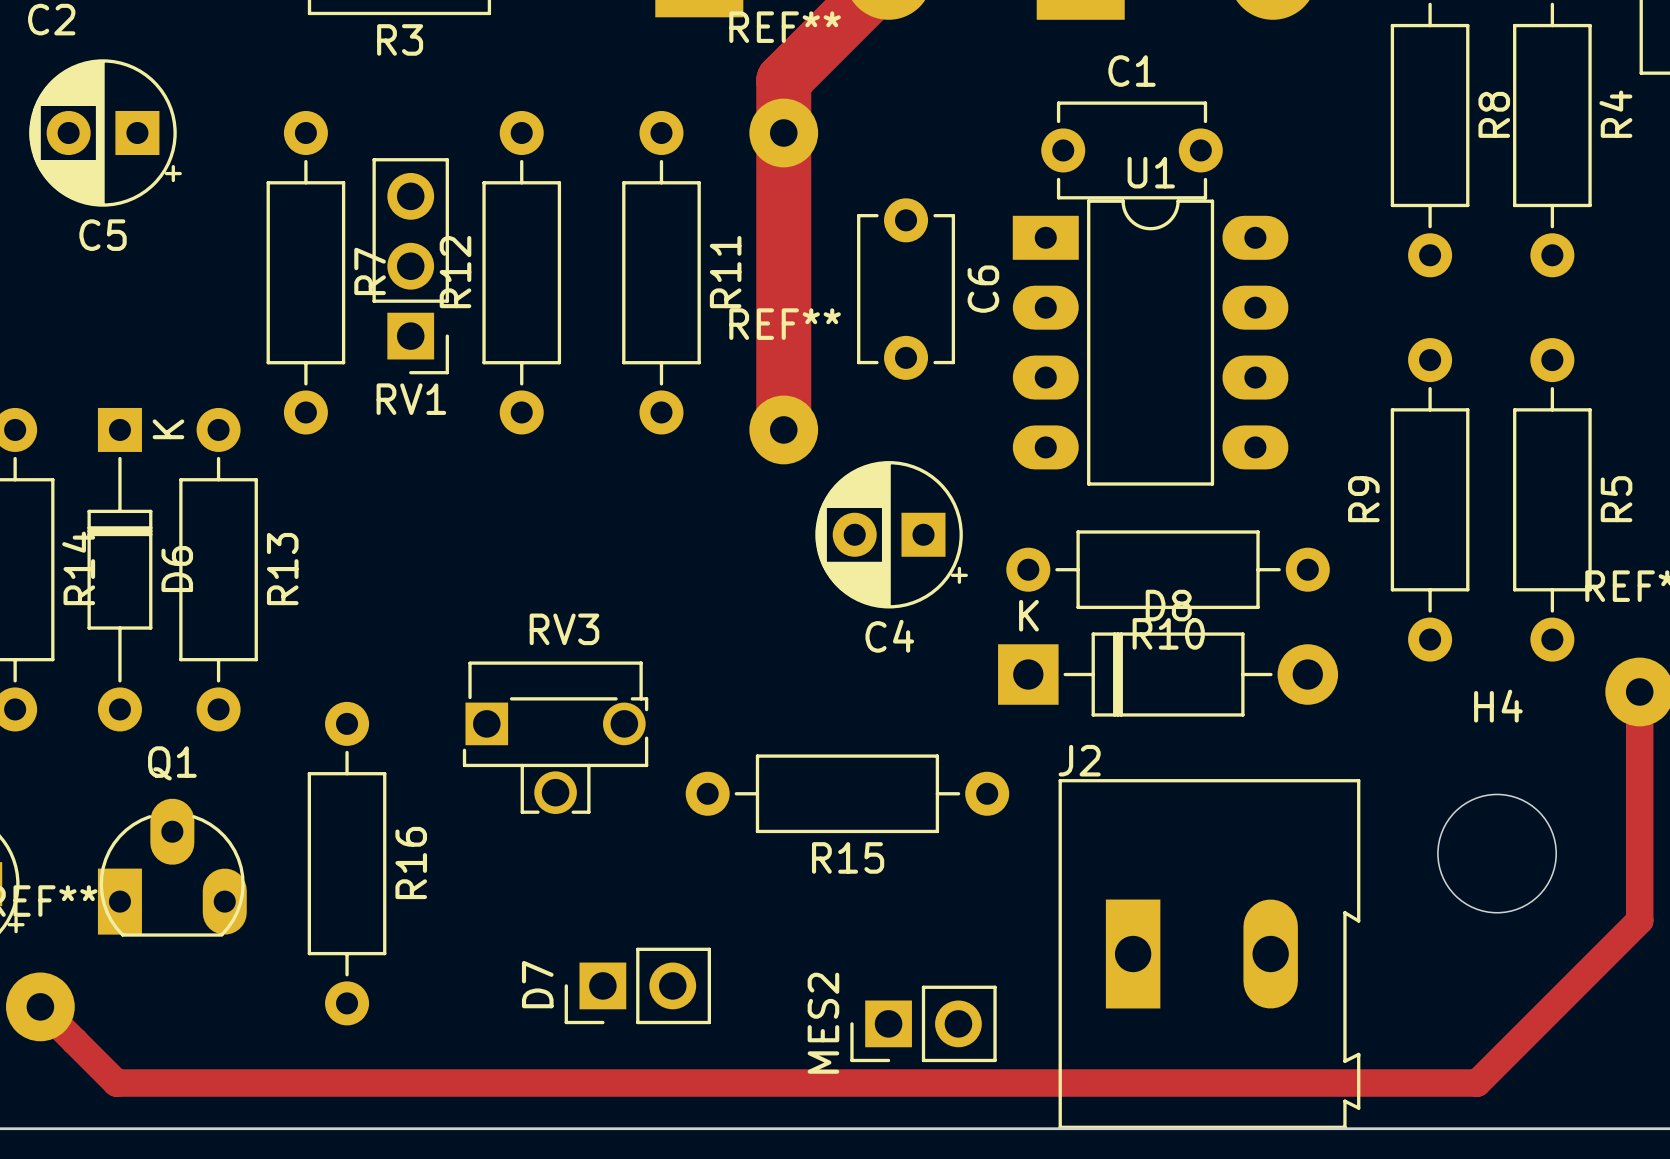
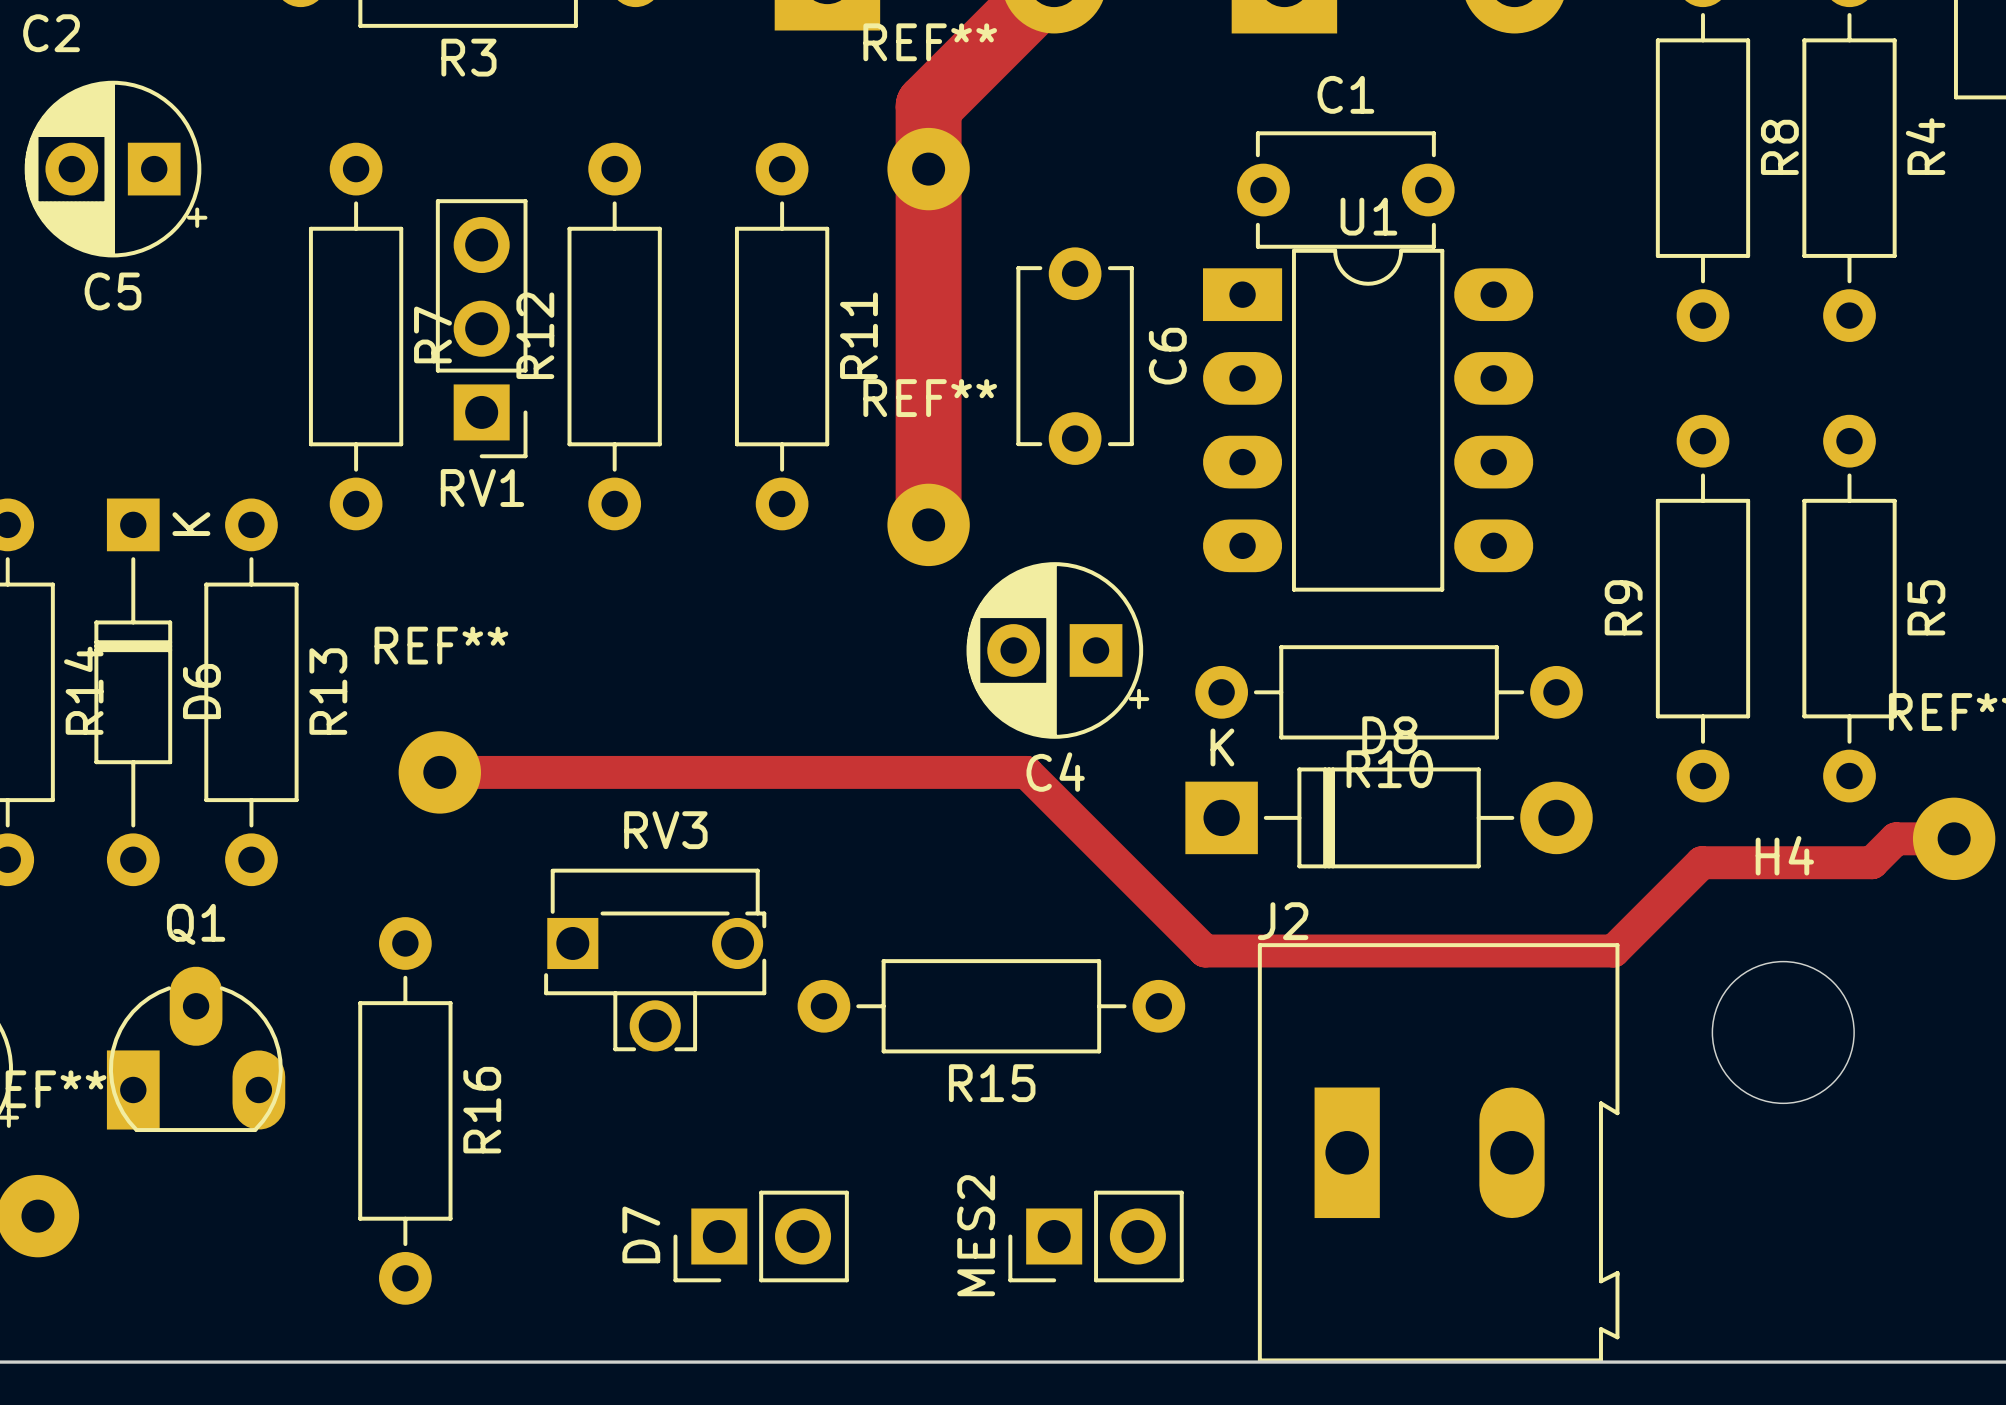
REF**: none -> (439, 772)
track: (1639, 691) (1639, 920) (1477, 1083) (116, 1083) (40, 1006) -> (1954, 838) (1895, 838) (1872, 862) (1701, 862) (1613, 950) (1205, 950) (1026, 772) (439, 772)
RV3 position: (555, 737) -> (655, 960)
R15 position: (847, 793) -> (991, 1006)
R16 position: (347, 863) -> (405, 1110)
D7 position: (637, 985) -> (761, 1236)

